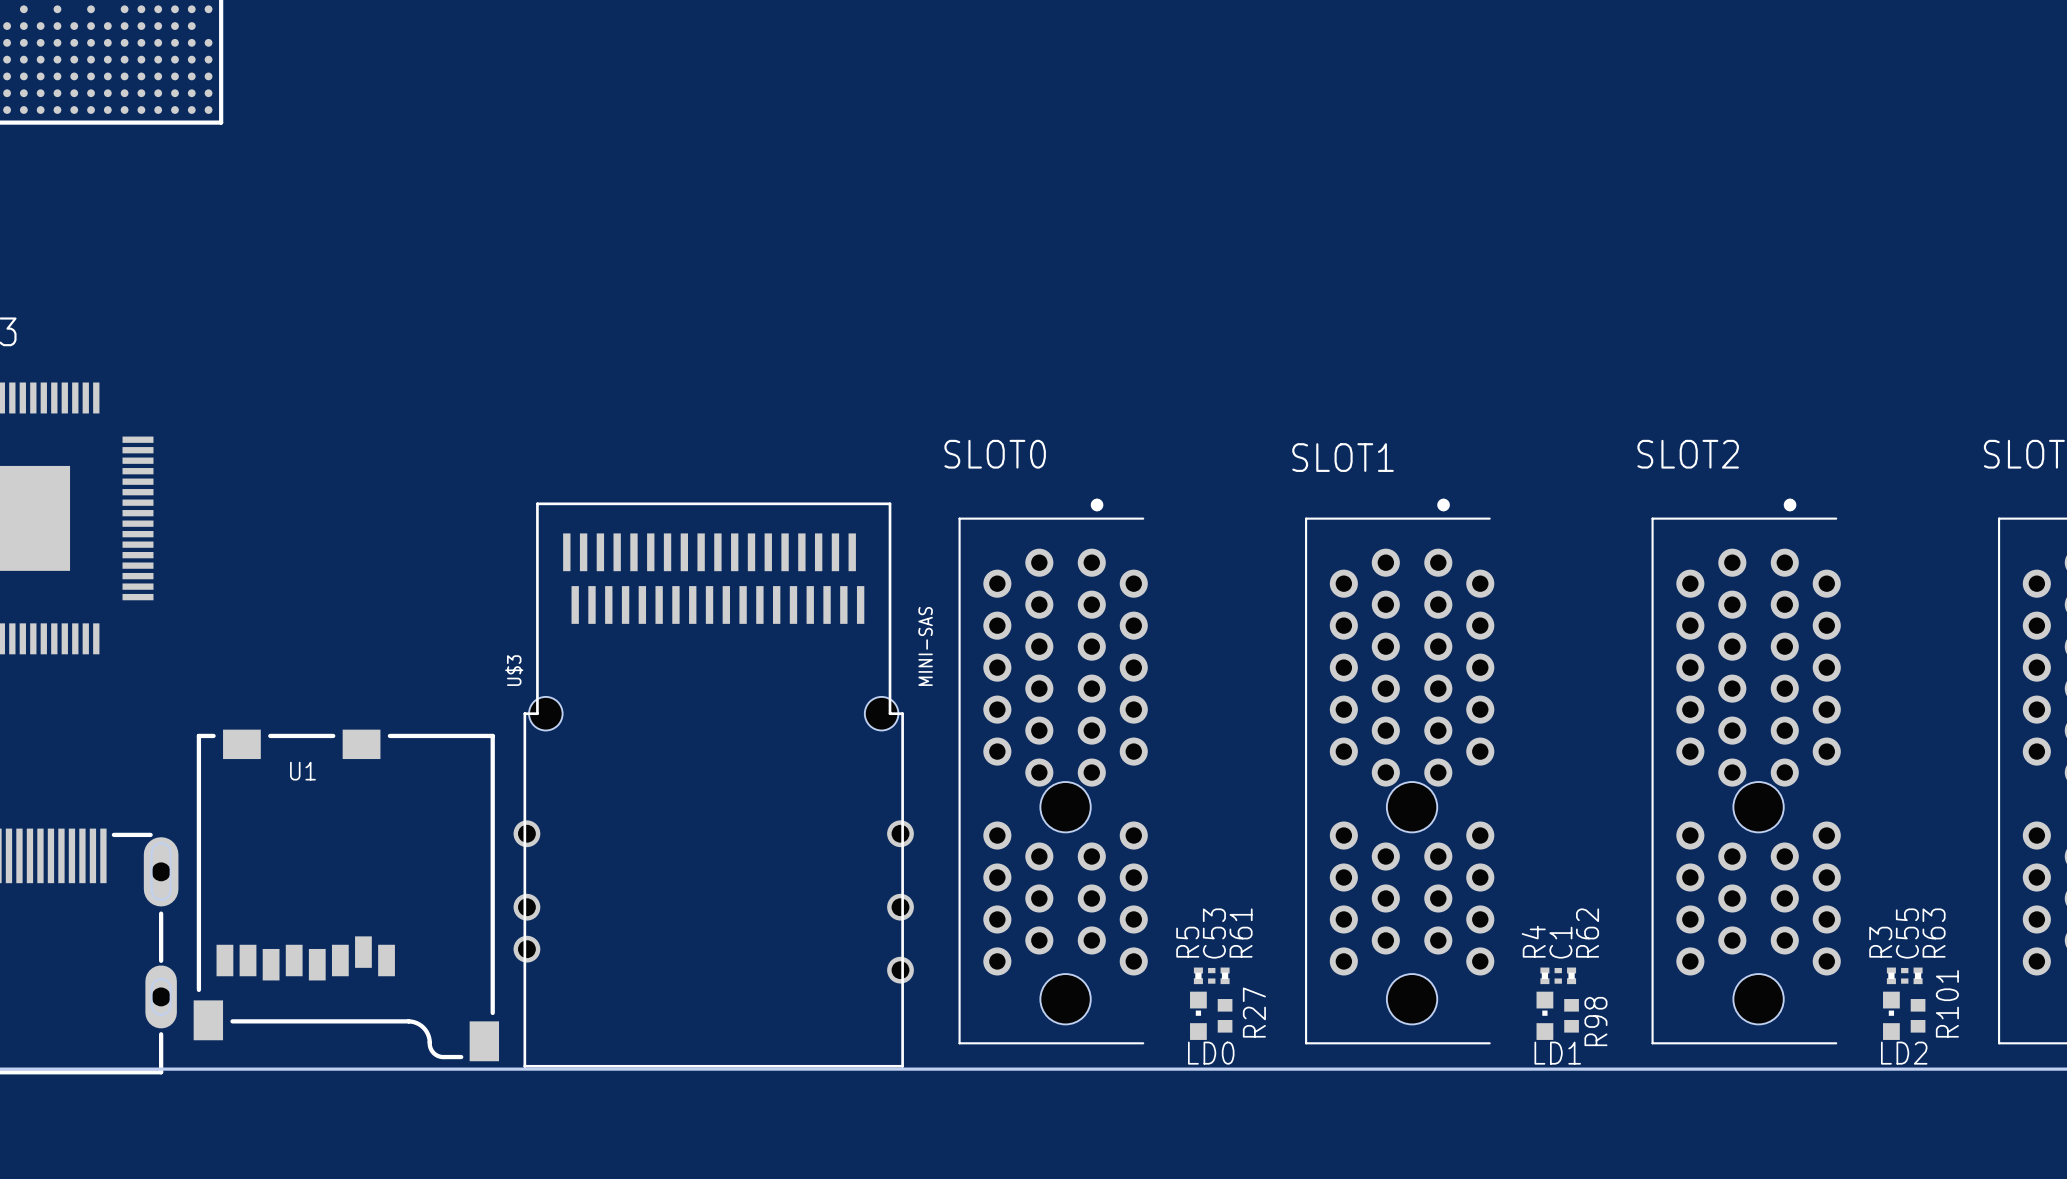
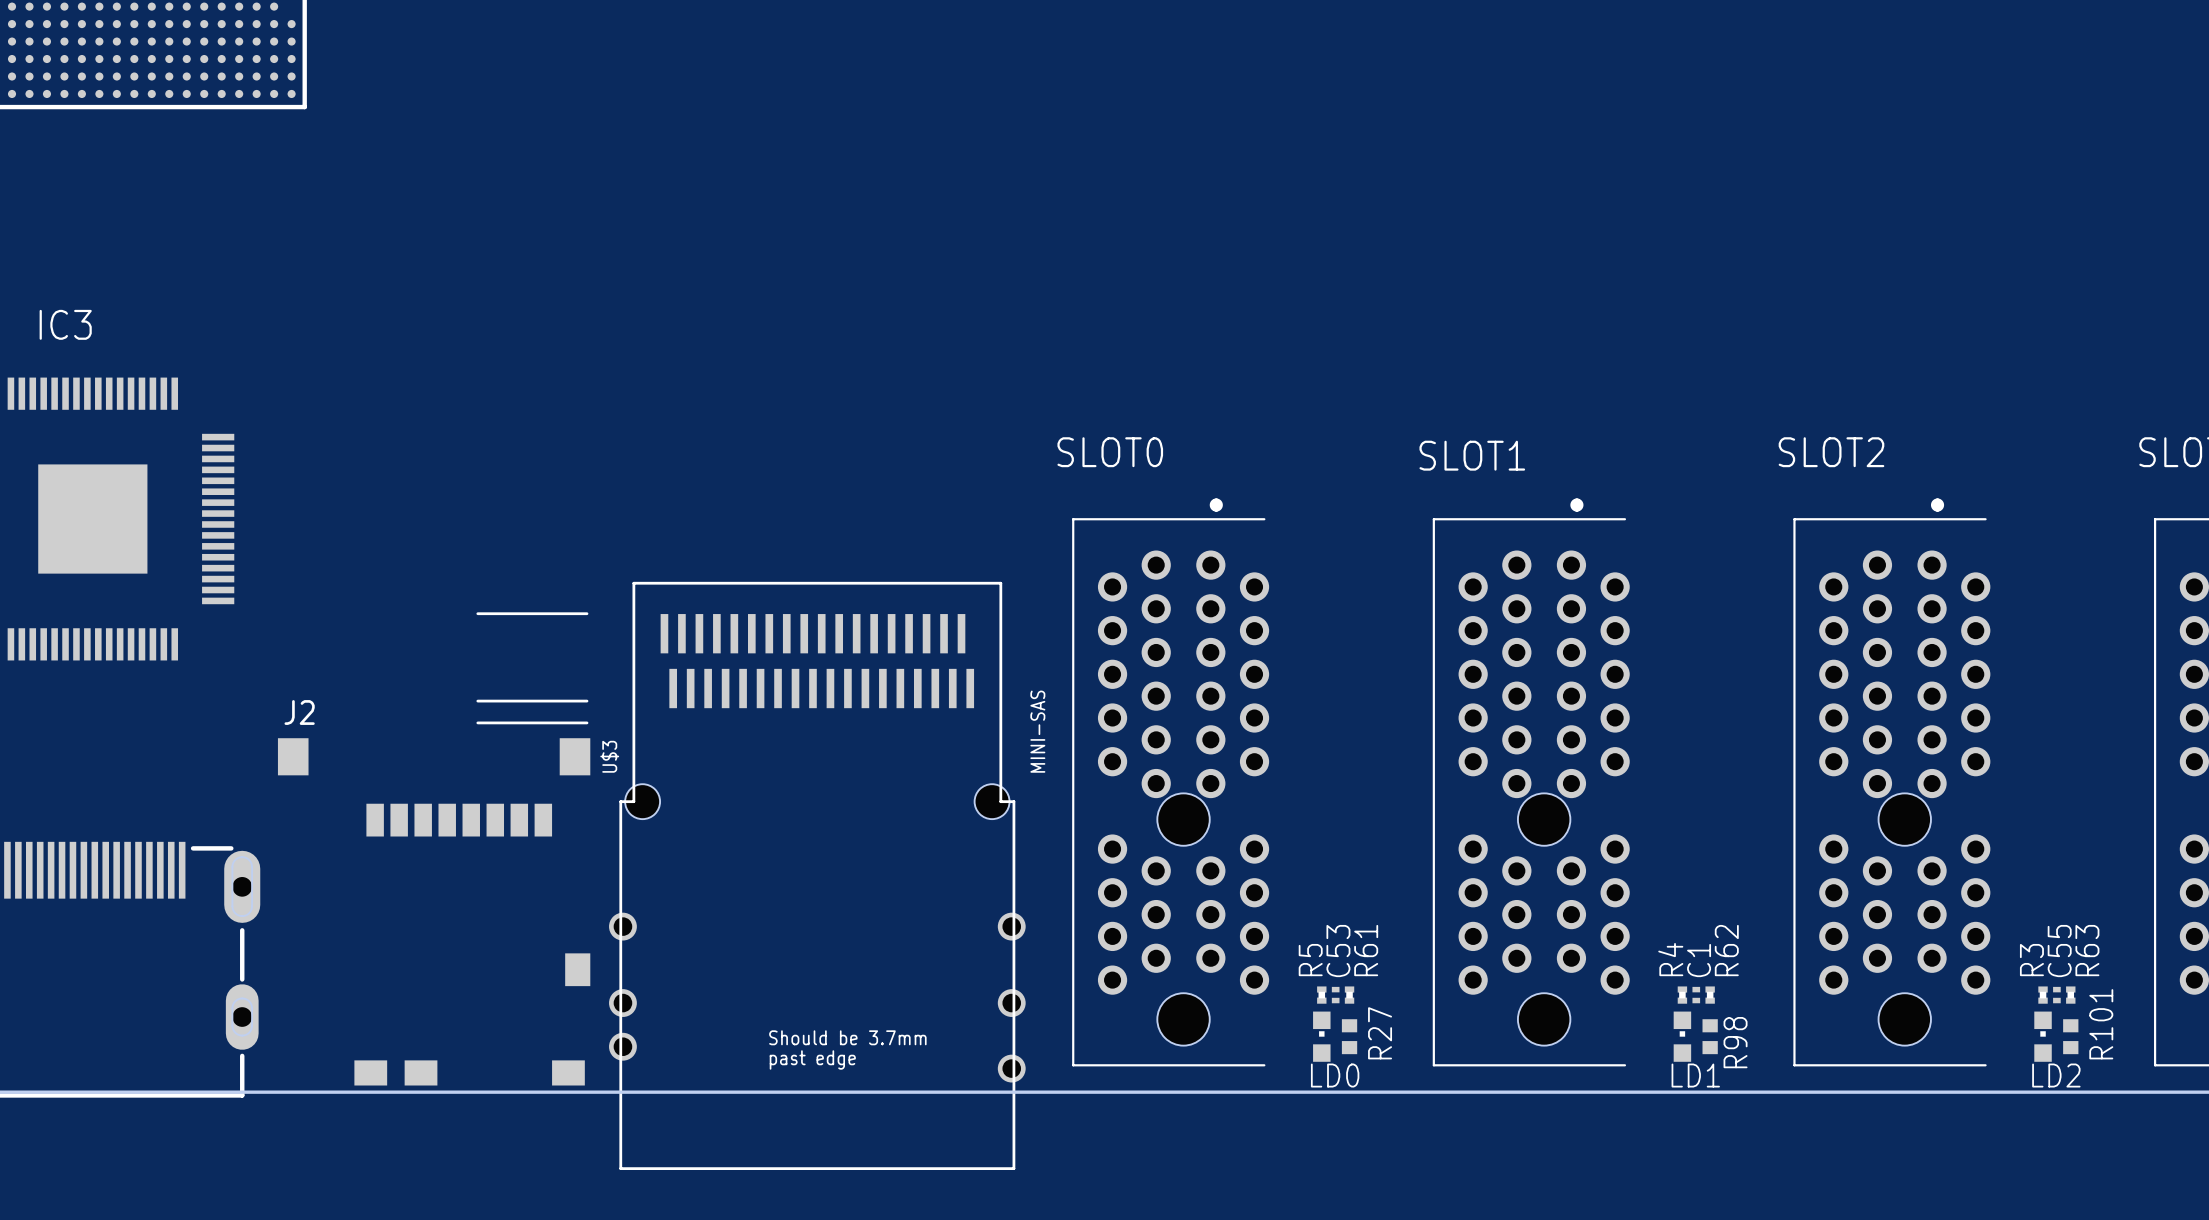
U$3 position: (713, 785) -> (817, 875)
J2: none -> (434, 848)
U1: (346, 895) -> none
text: none -> Should be 3.7mm (847, 1037)
text: none -> past edge (812, 1059)

